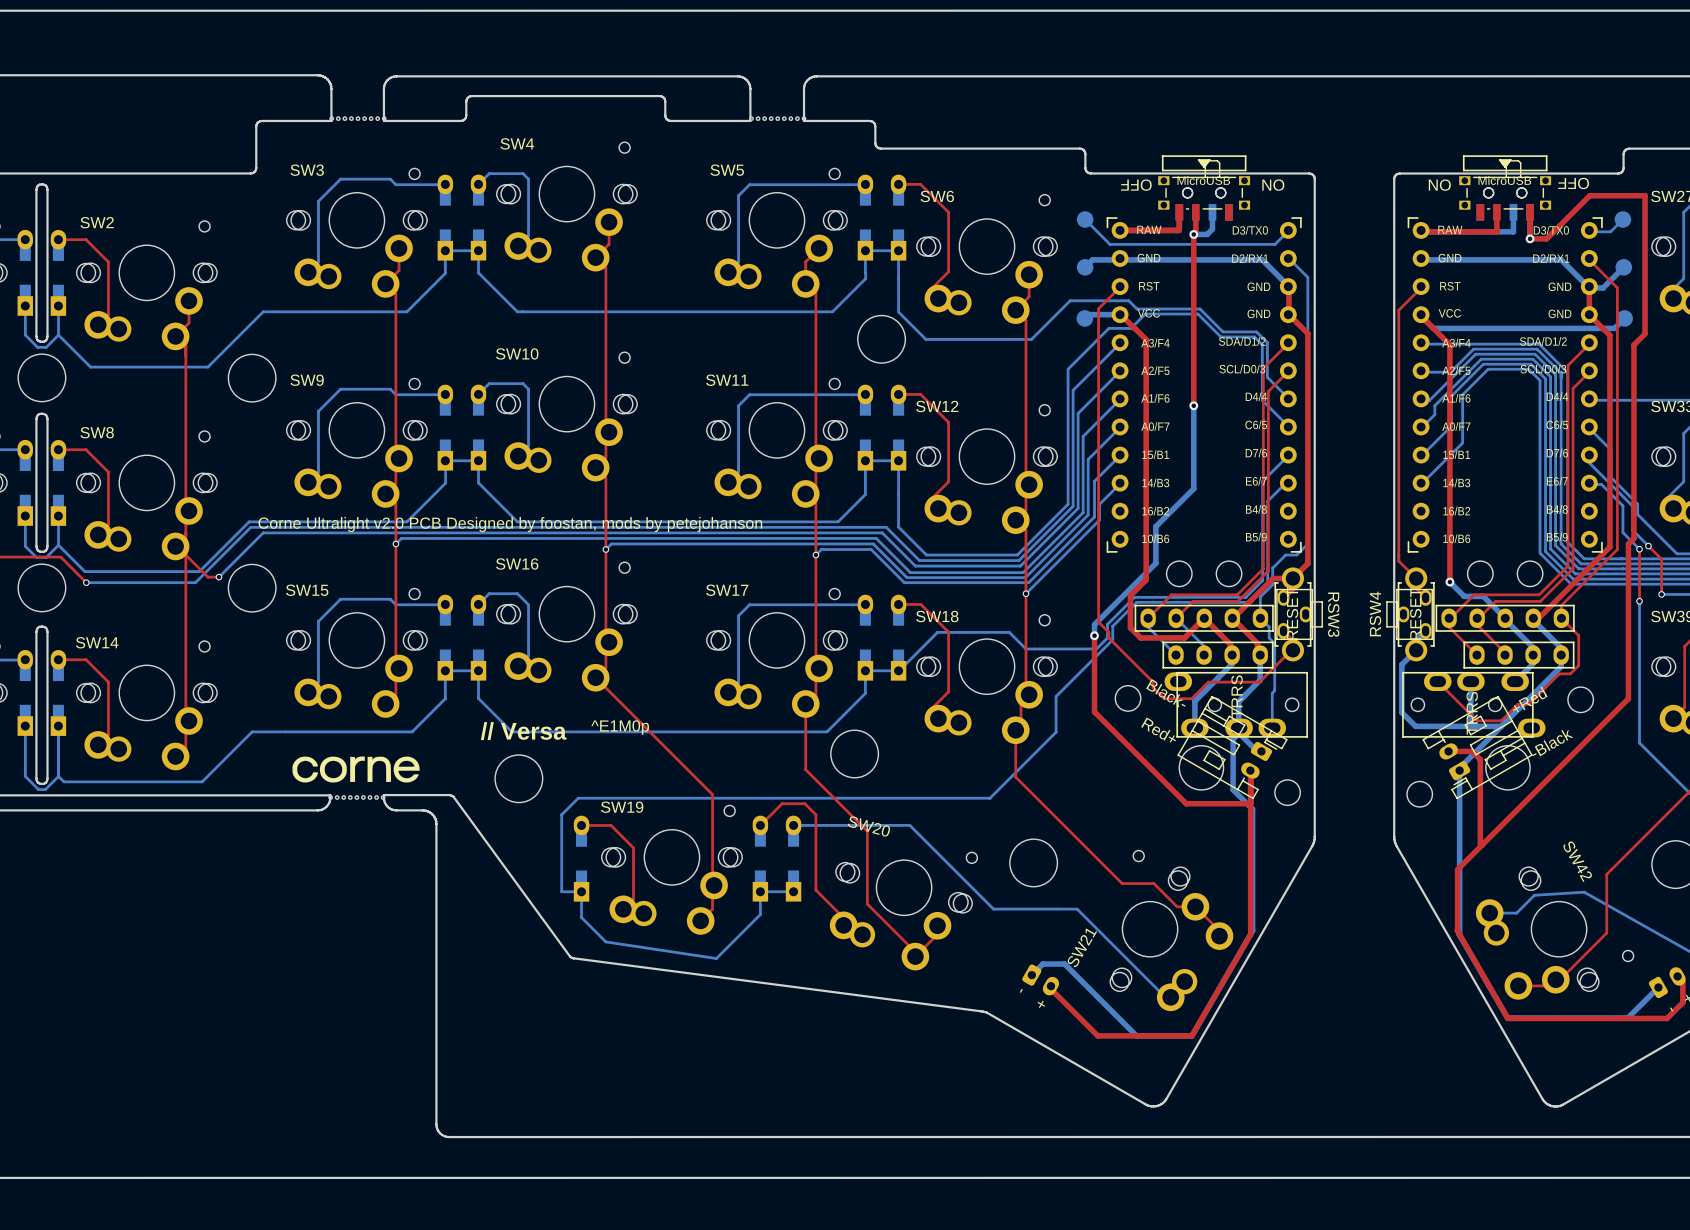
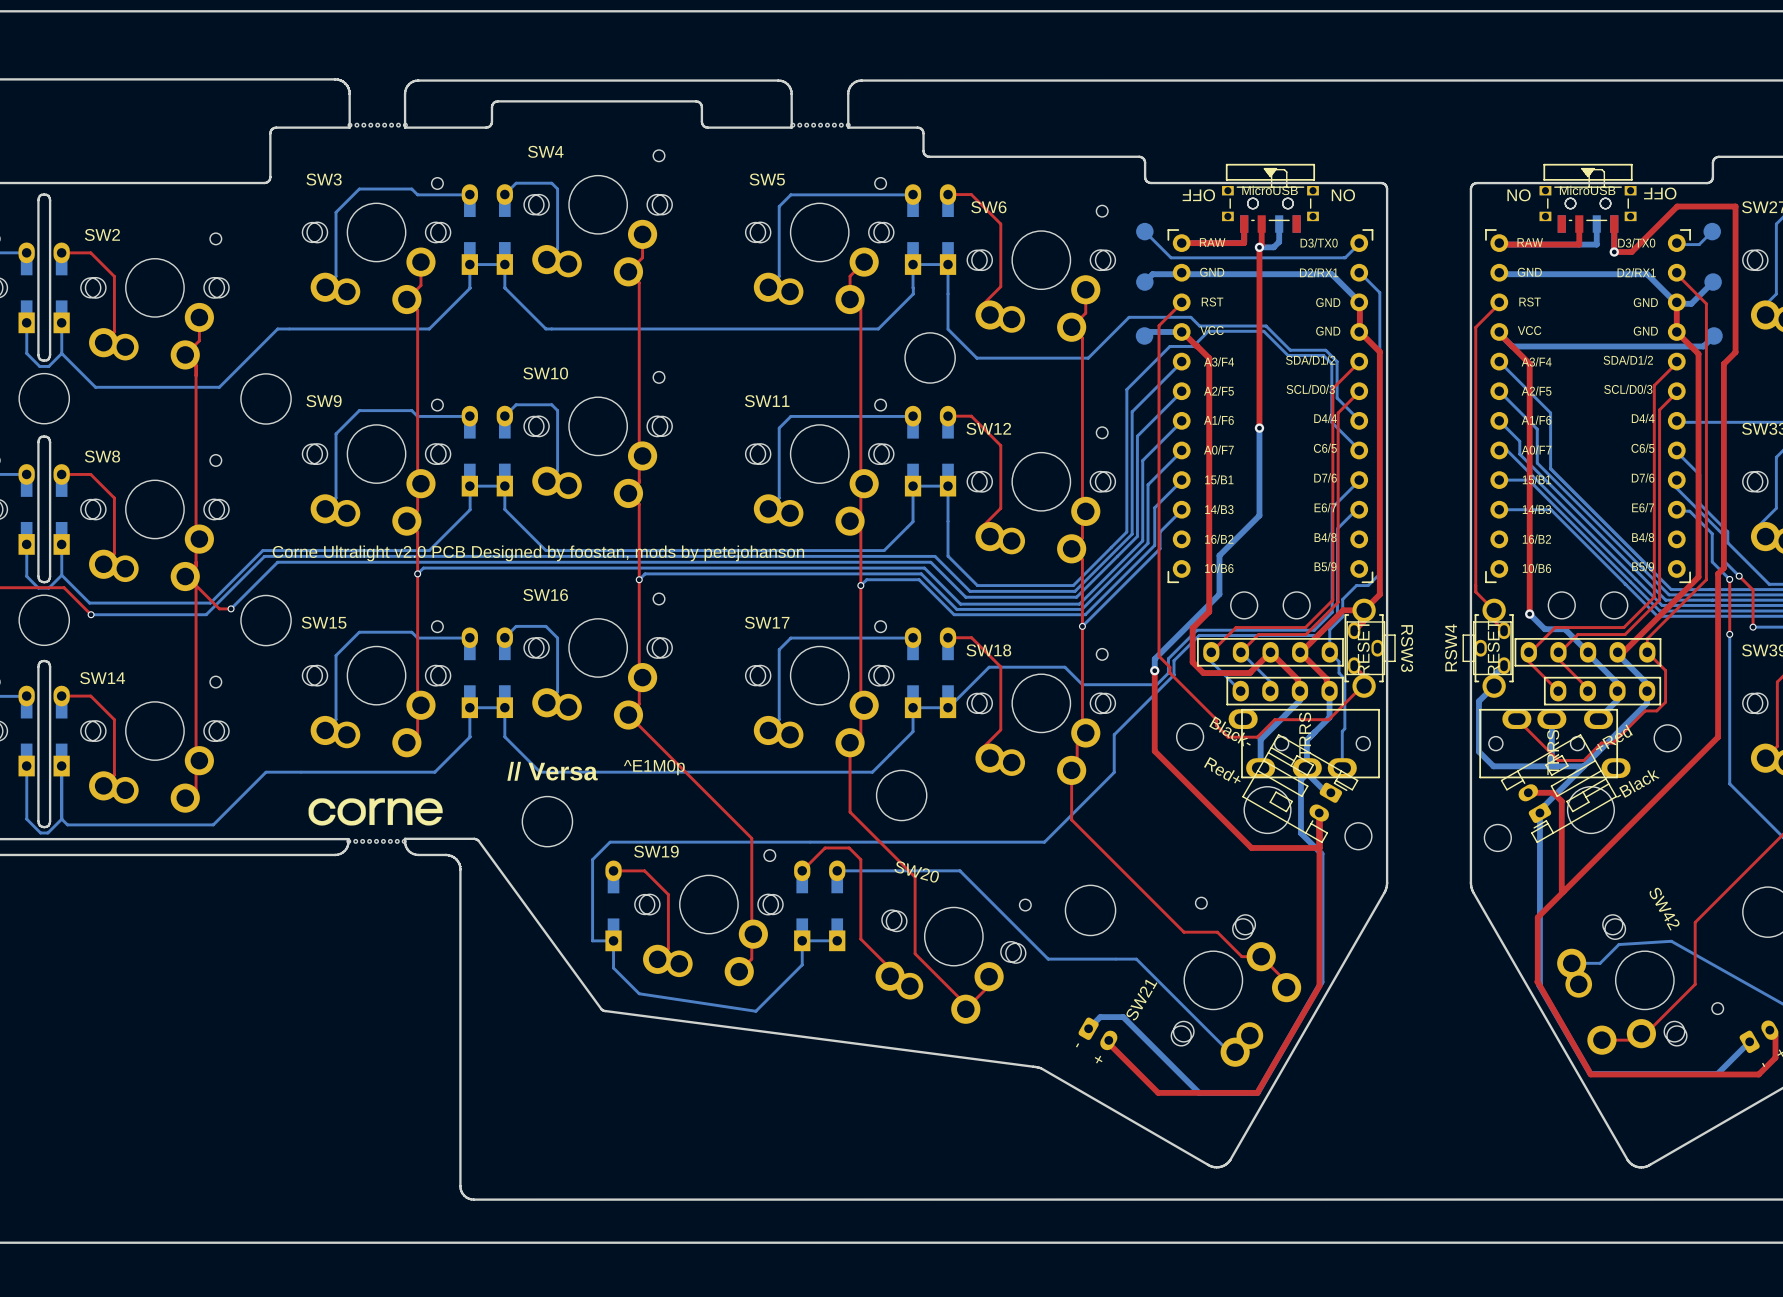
bottom track: (1421, 344) (1539, 344) (1567, 372) (1567, 542) (1584, 558) -> (1499, 361) (1550, 412) (1550, 468) (1671, 589)
bottom track: (1421, 372) (1450, 372) (1473, 349) (1537, 349) (1561, 373) (1561, 543) (1582, 563) -> (1499, 391) (1537, 429) (1537, 463) (1669, 594)
bottom track: (1421, 400) (1429, 400) (1475, 354) (1535, 354) (1555, 374) (1555, 545) -> (1499, 420) (1519, 441) (1519, 454) (1641, 575)
bottom track: (1421, 428) (1434, 414) (1434, 405) (1481, 359) (1532, 359) (1550, 376) (1550, 548) -> (1499, 450) (1507, 450) (1635, 579)
bottom track: (1421, 456) (1451, 425) (1451, 396) (1483, 364) (1530, 364) (1545, 378) (1545, 551) -> (1499, 480) (1528, 480) (1630, 581)
bottom track: (1421, 484) (1462, 442) (1462, 394) (1488, 369) (1528, 369) (1540, 380) (1540, 553) -> (1499, 509) (1550, 509) (1624, 583)

